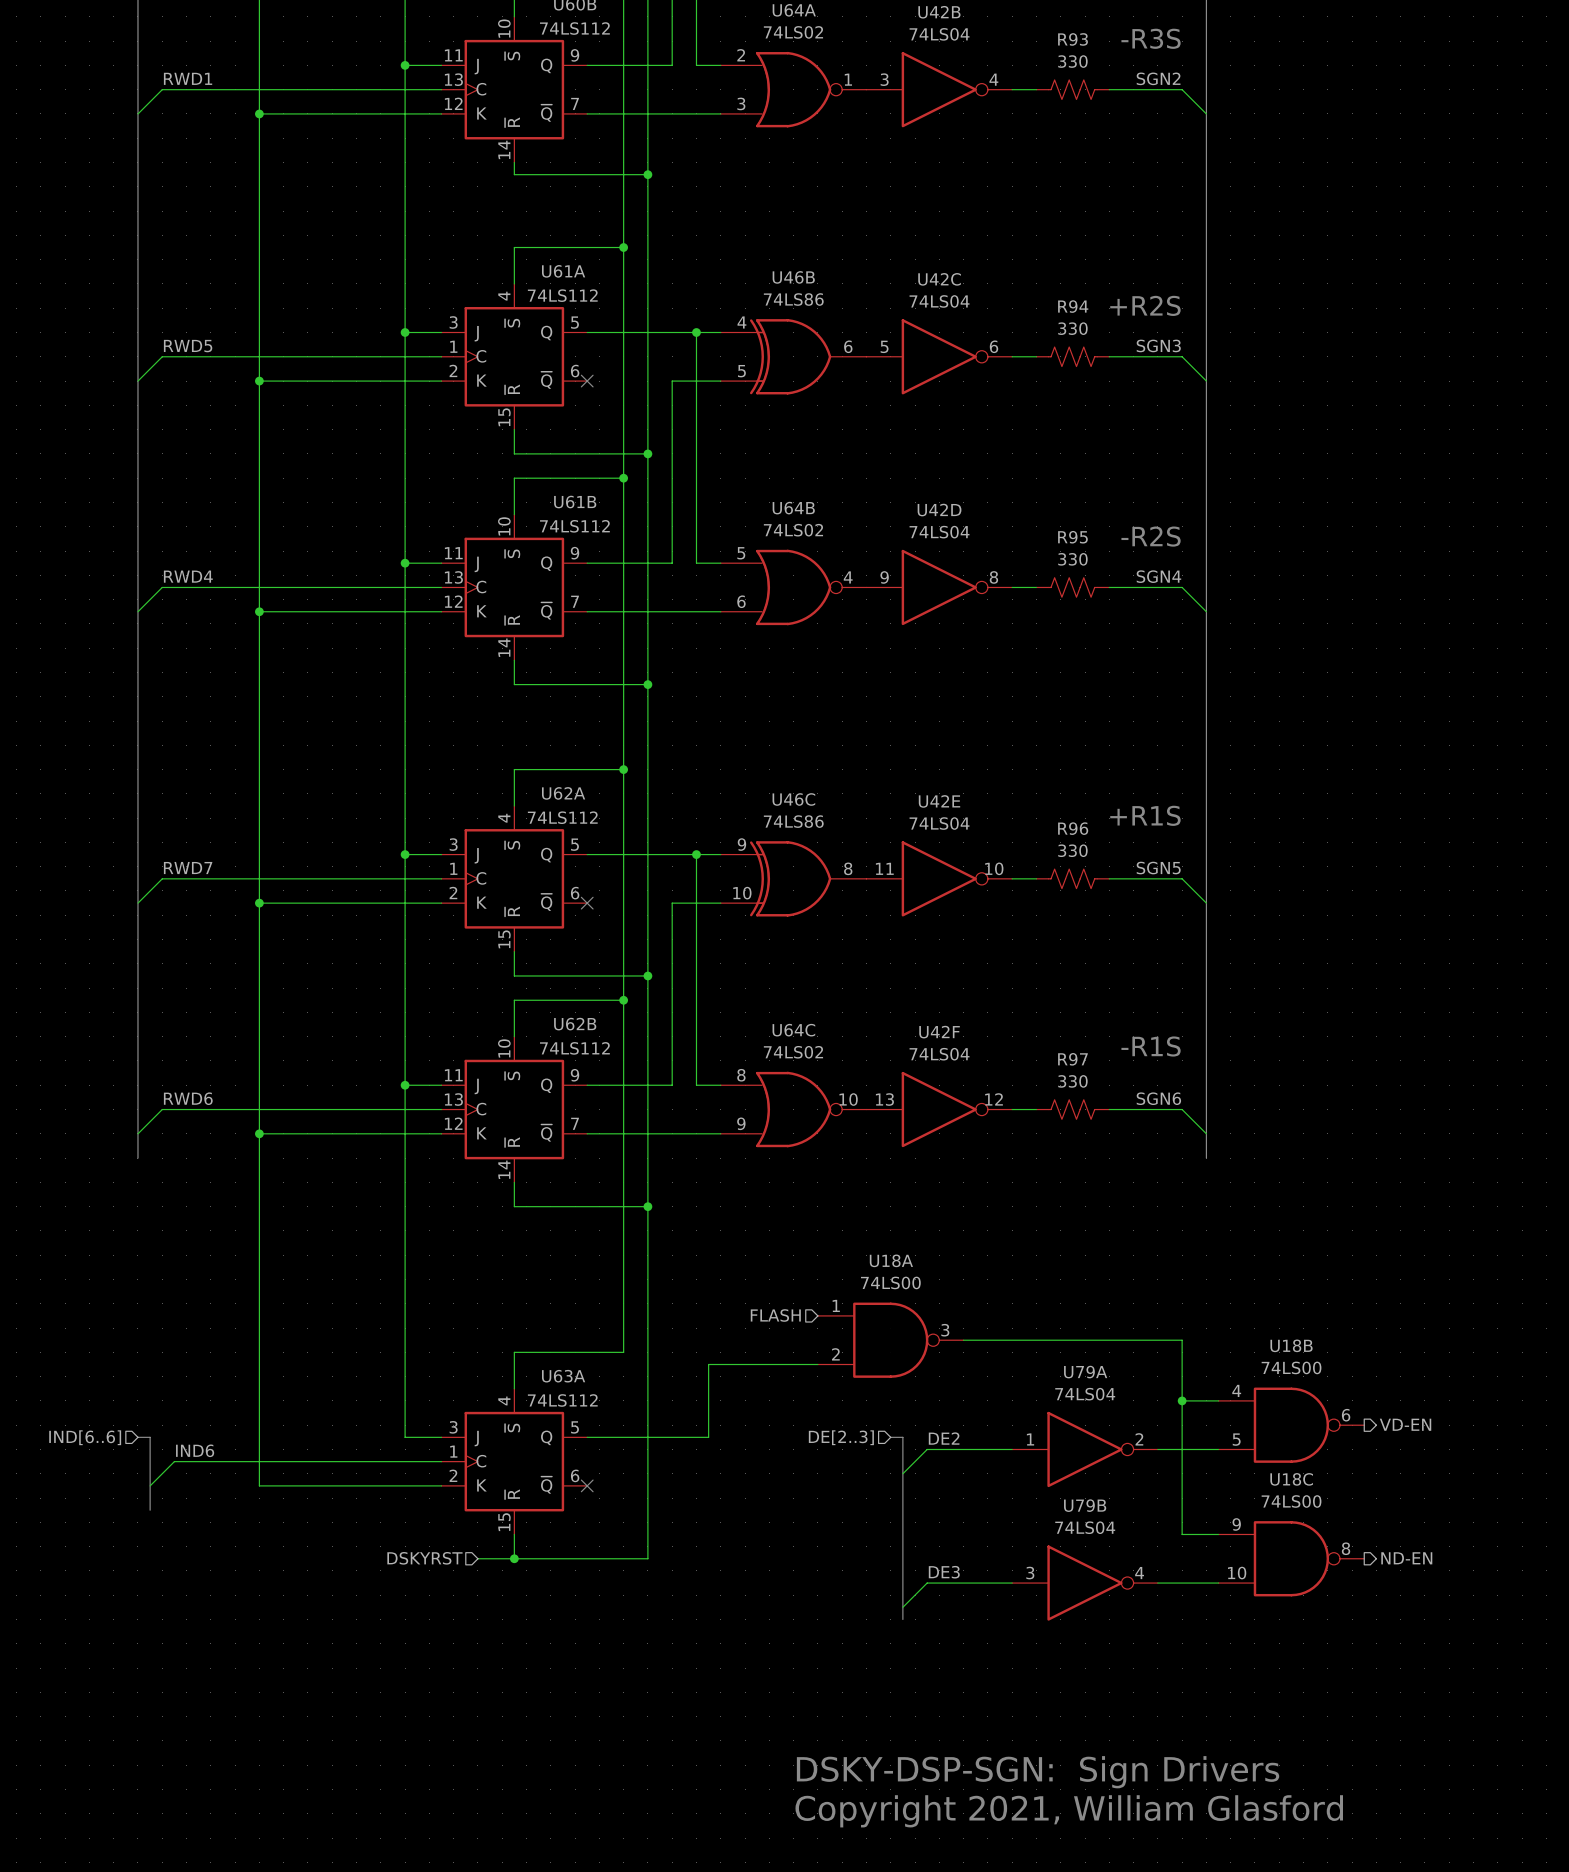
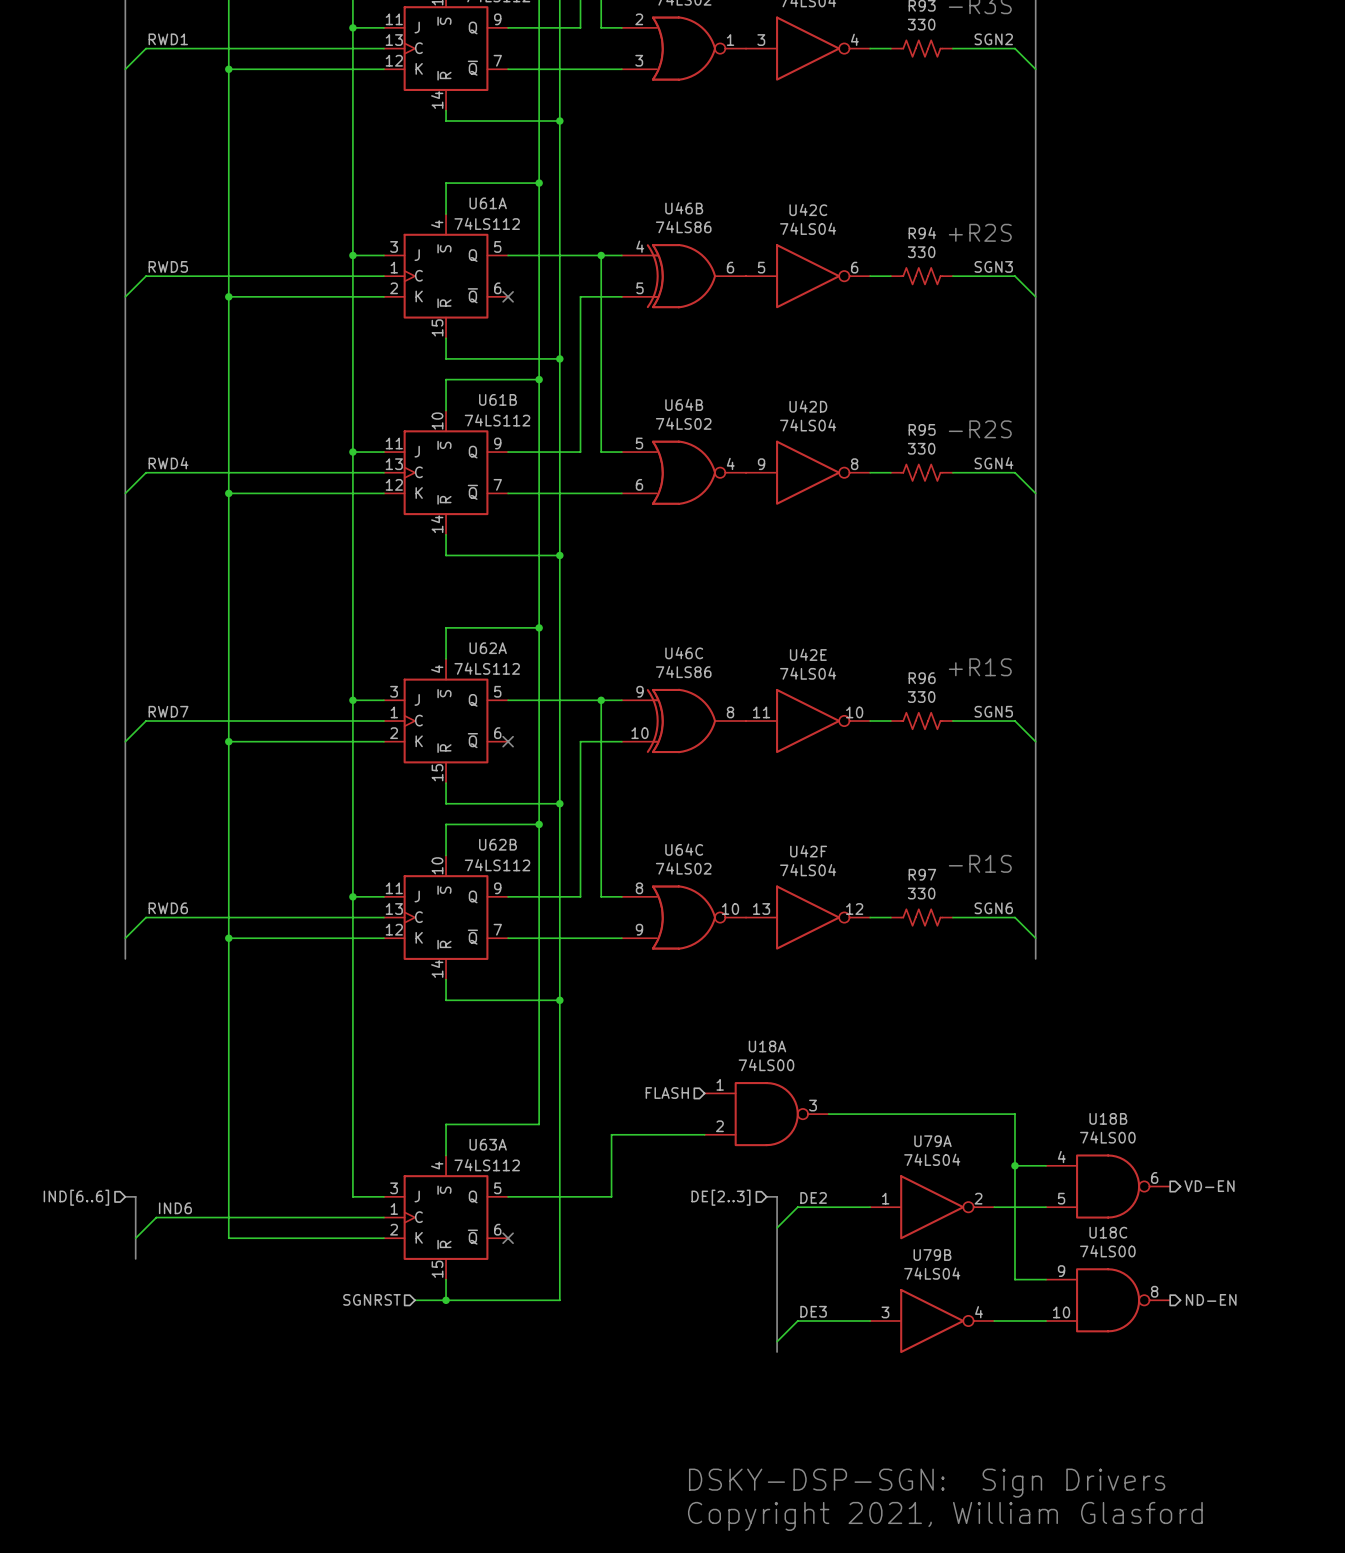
hierarchical label: DSKYRST (424, 1558) -> SGNRST (371, 1299)

